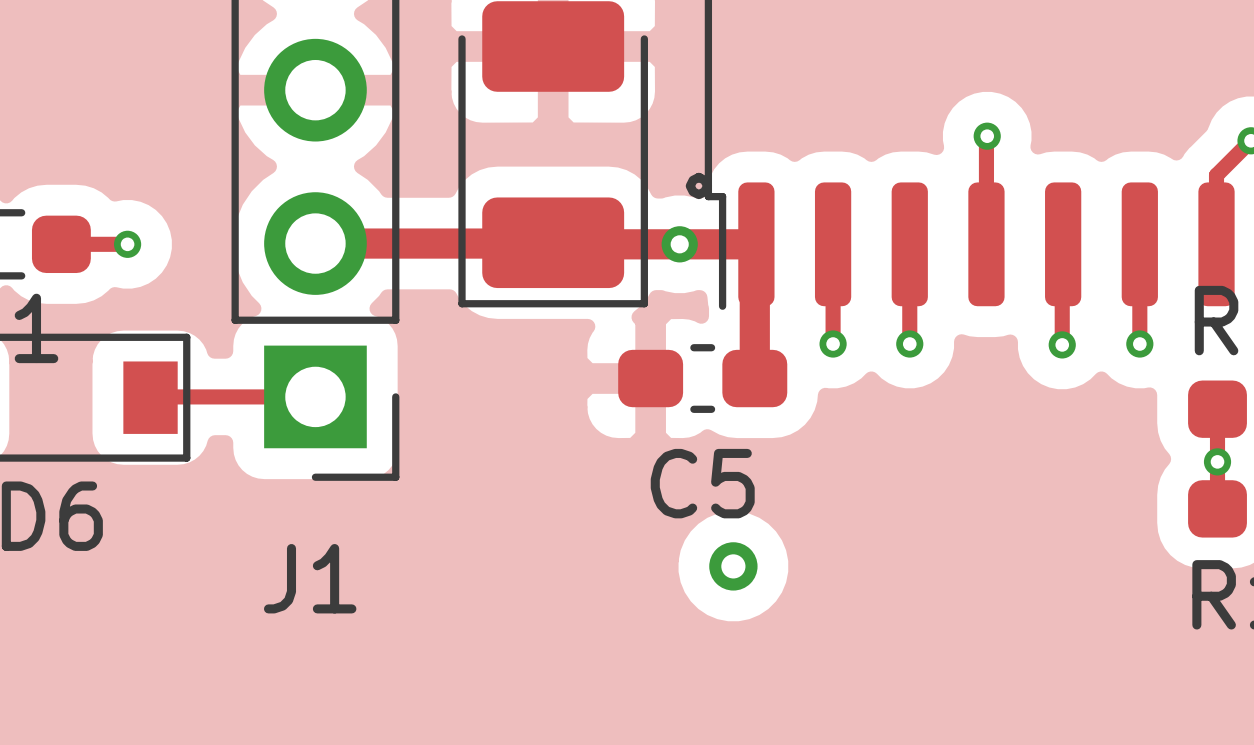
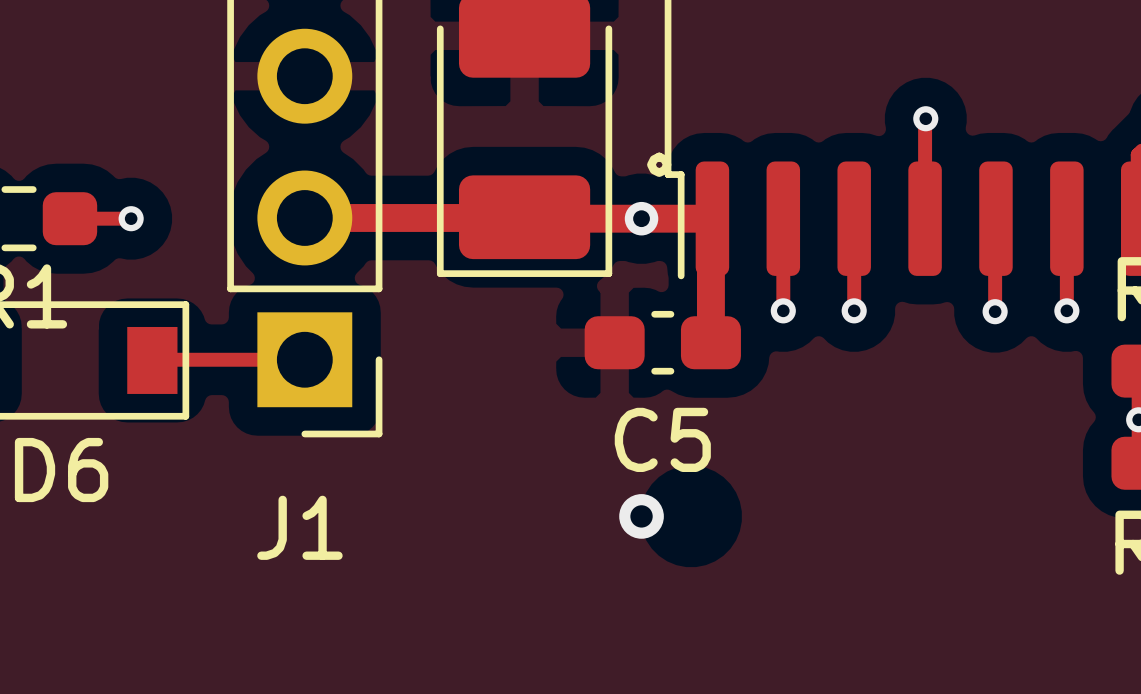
via position: (733, 566) -> (641, 516)

